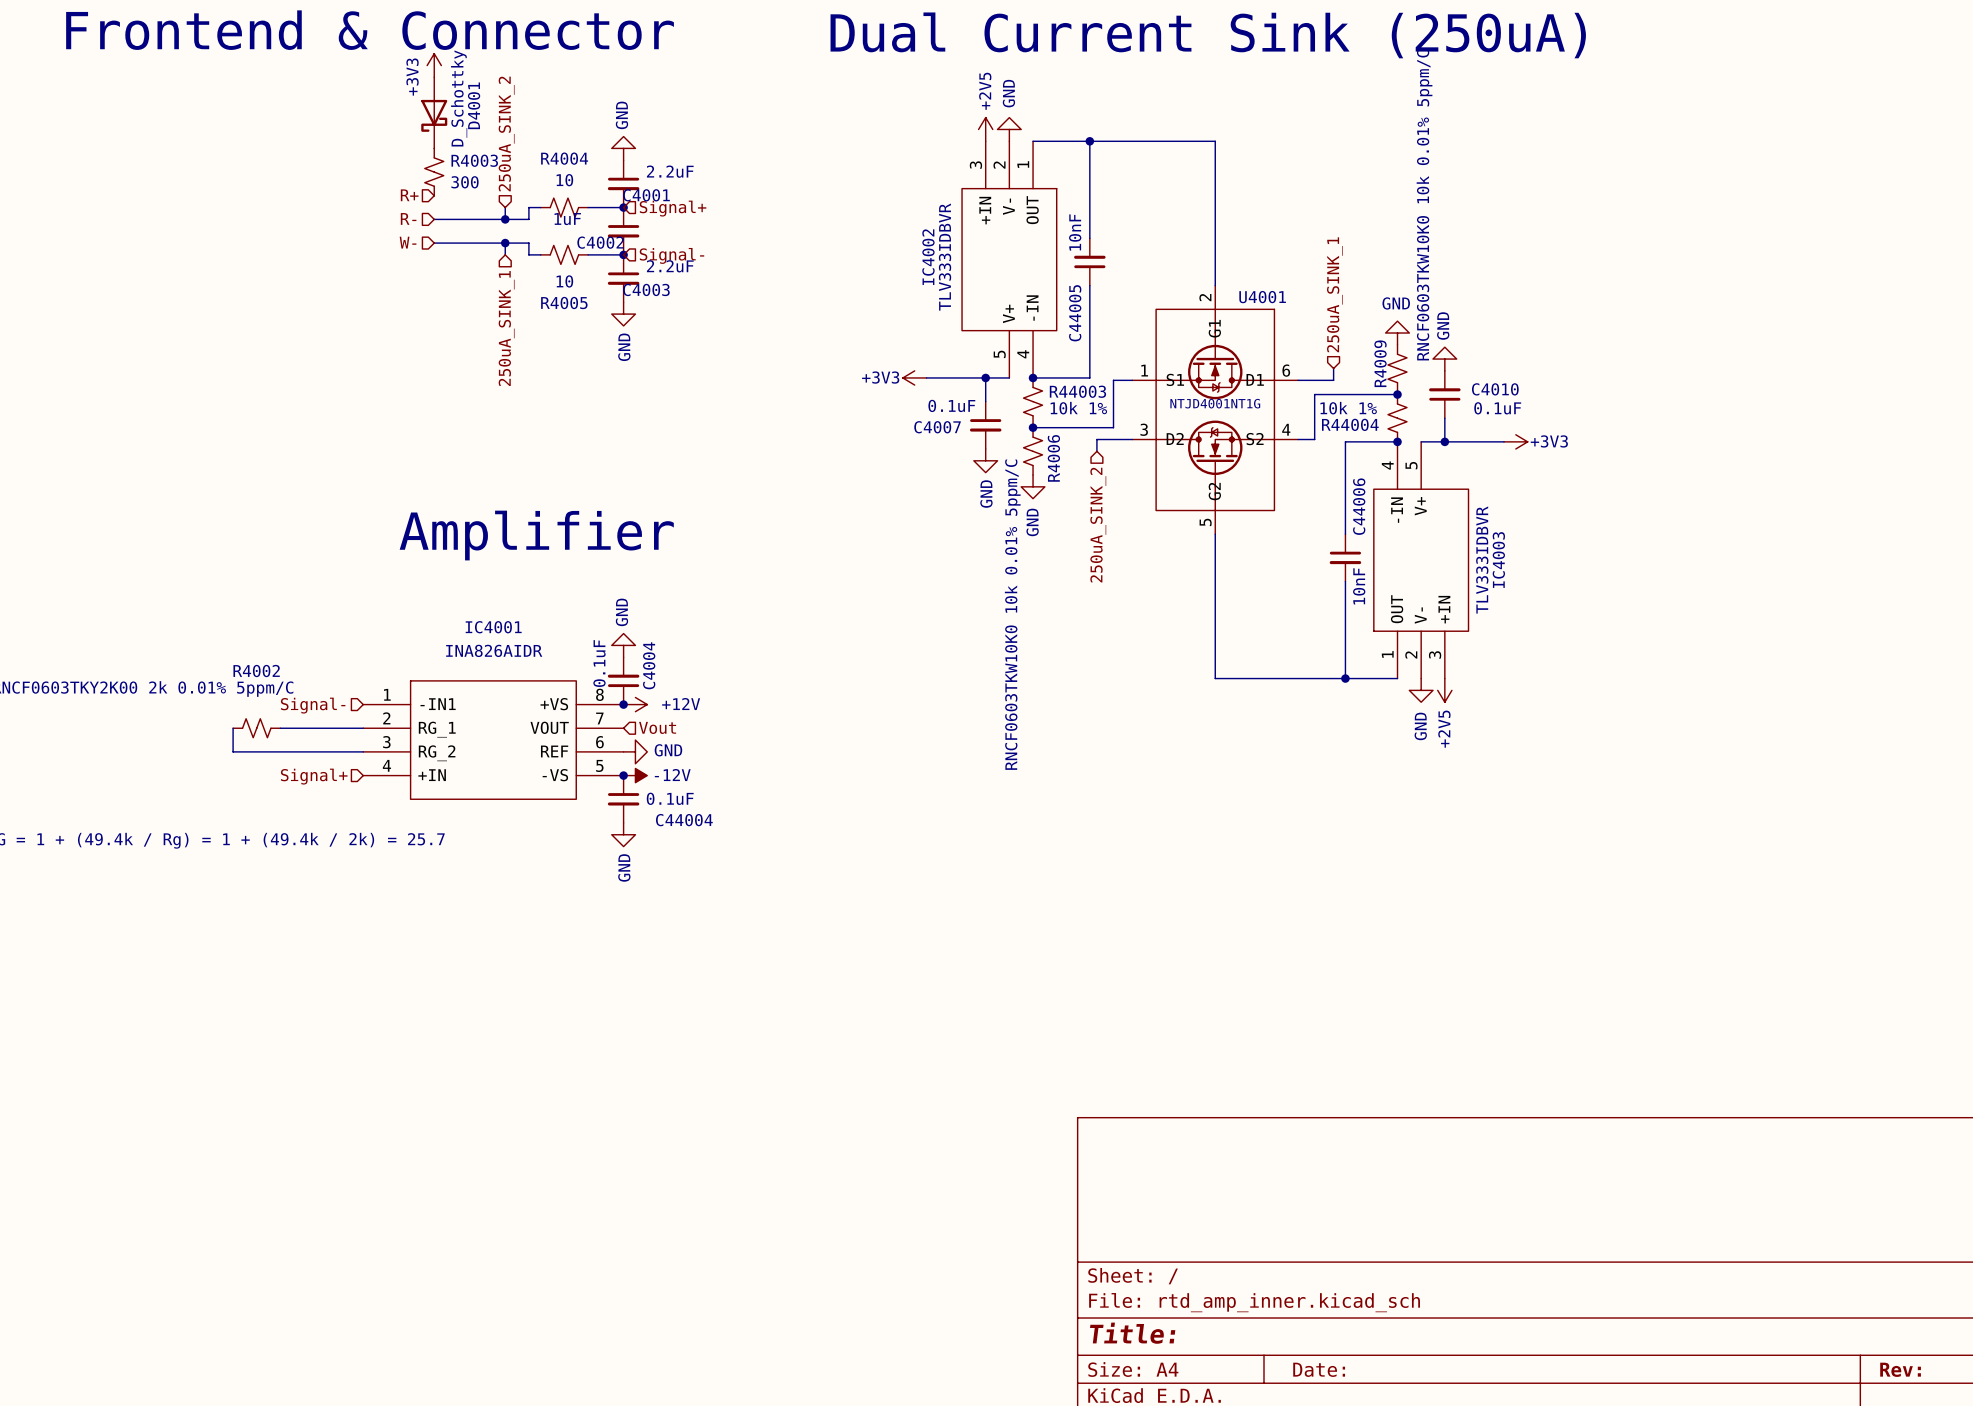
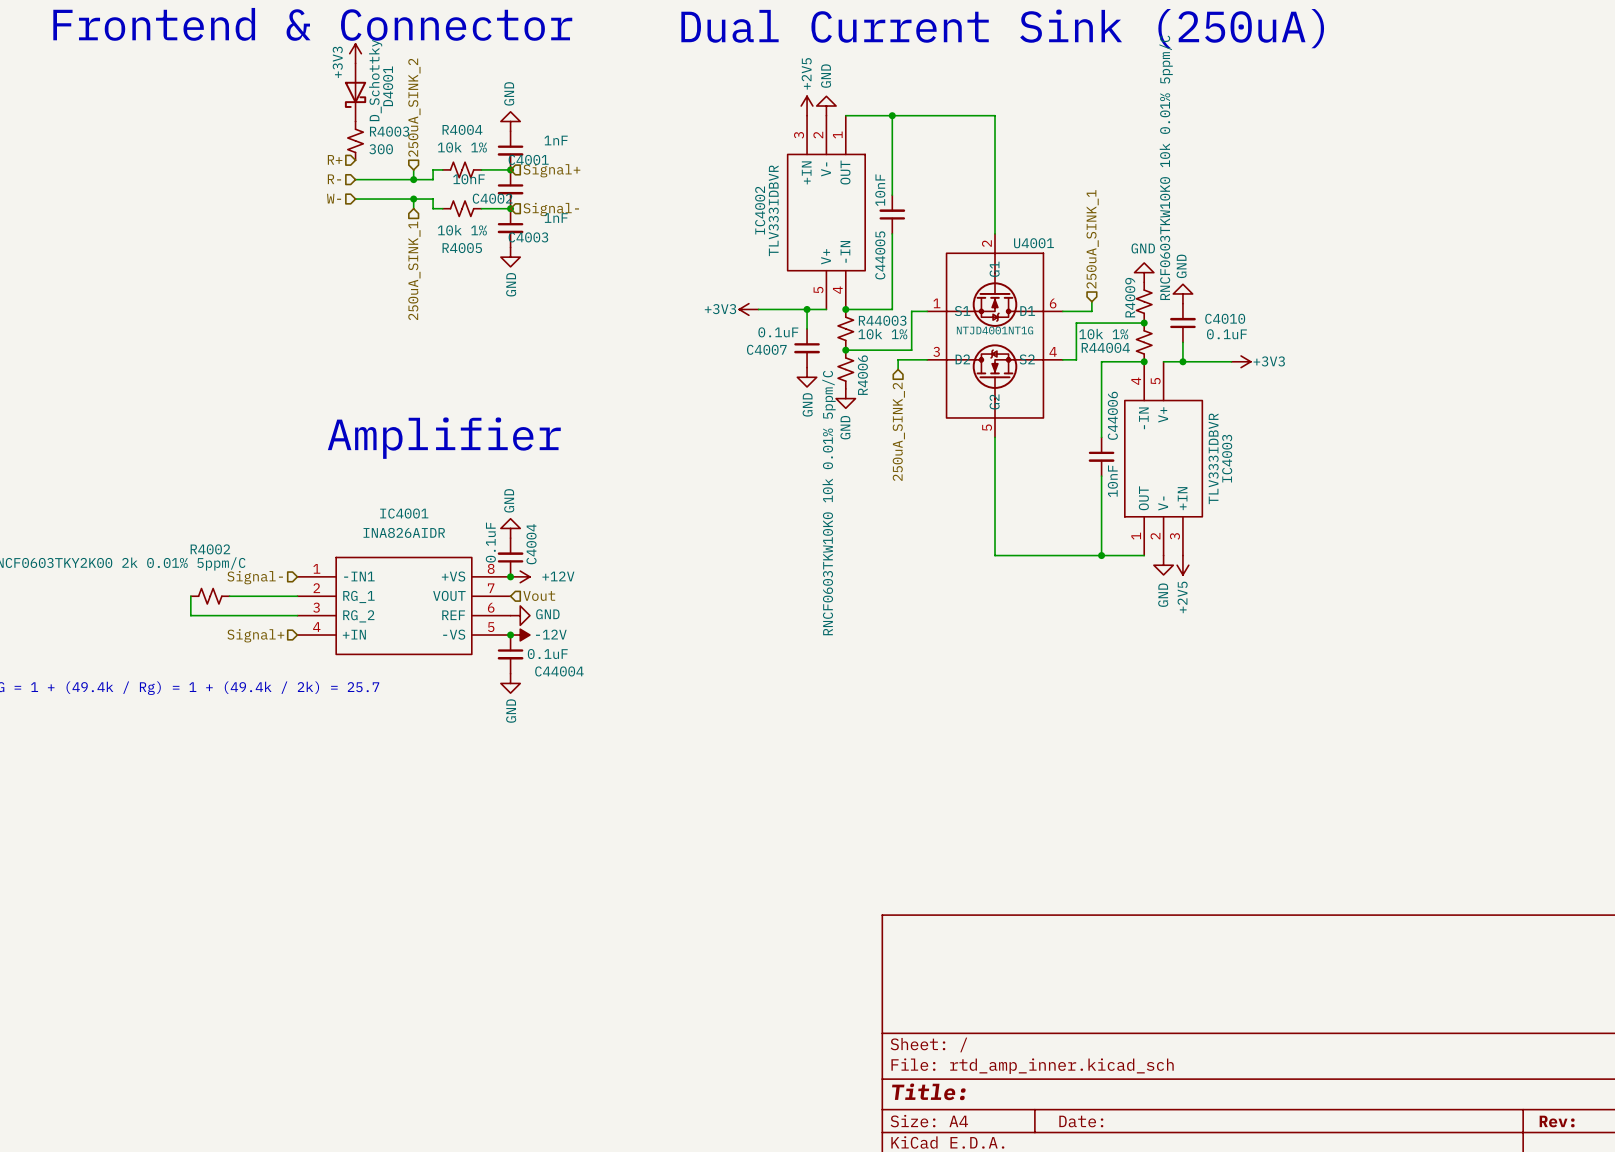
C4001 value: 2.2uF (670, 171) -> 1nF (556, 140)
R4004 value: 10 (564, 180) -> 10k 1% (462, 147)
C4002 value: 1uF (567, 219) -> 10nF (468, 179)
C4003 value: 2.2uF (670, 266) -> 1nF (556, 218)
R4005 value: 10 (564, 281) -> 10k 1% (462, 230)

